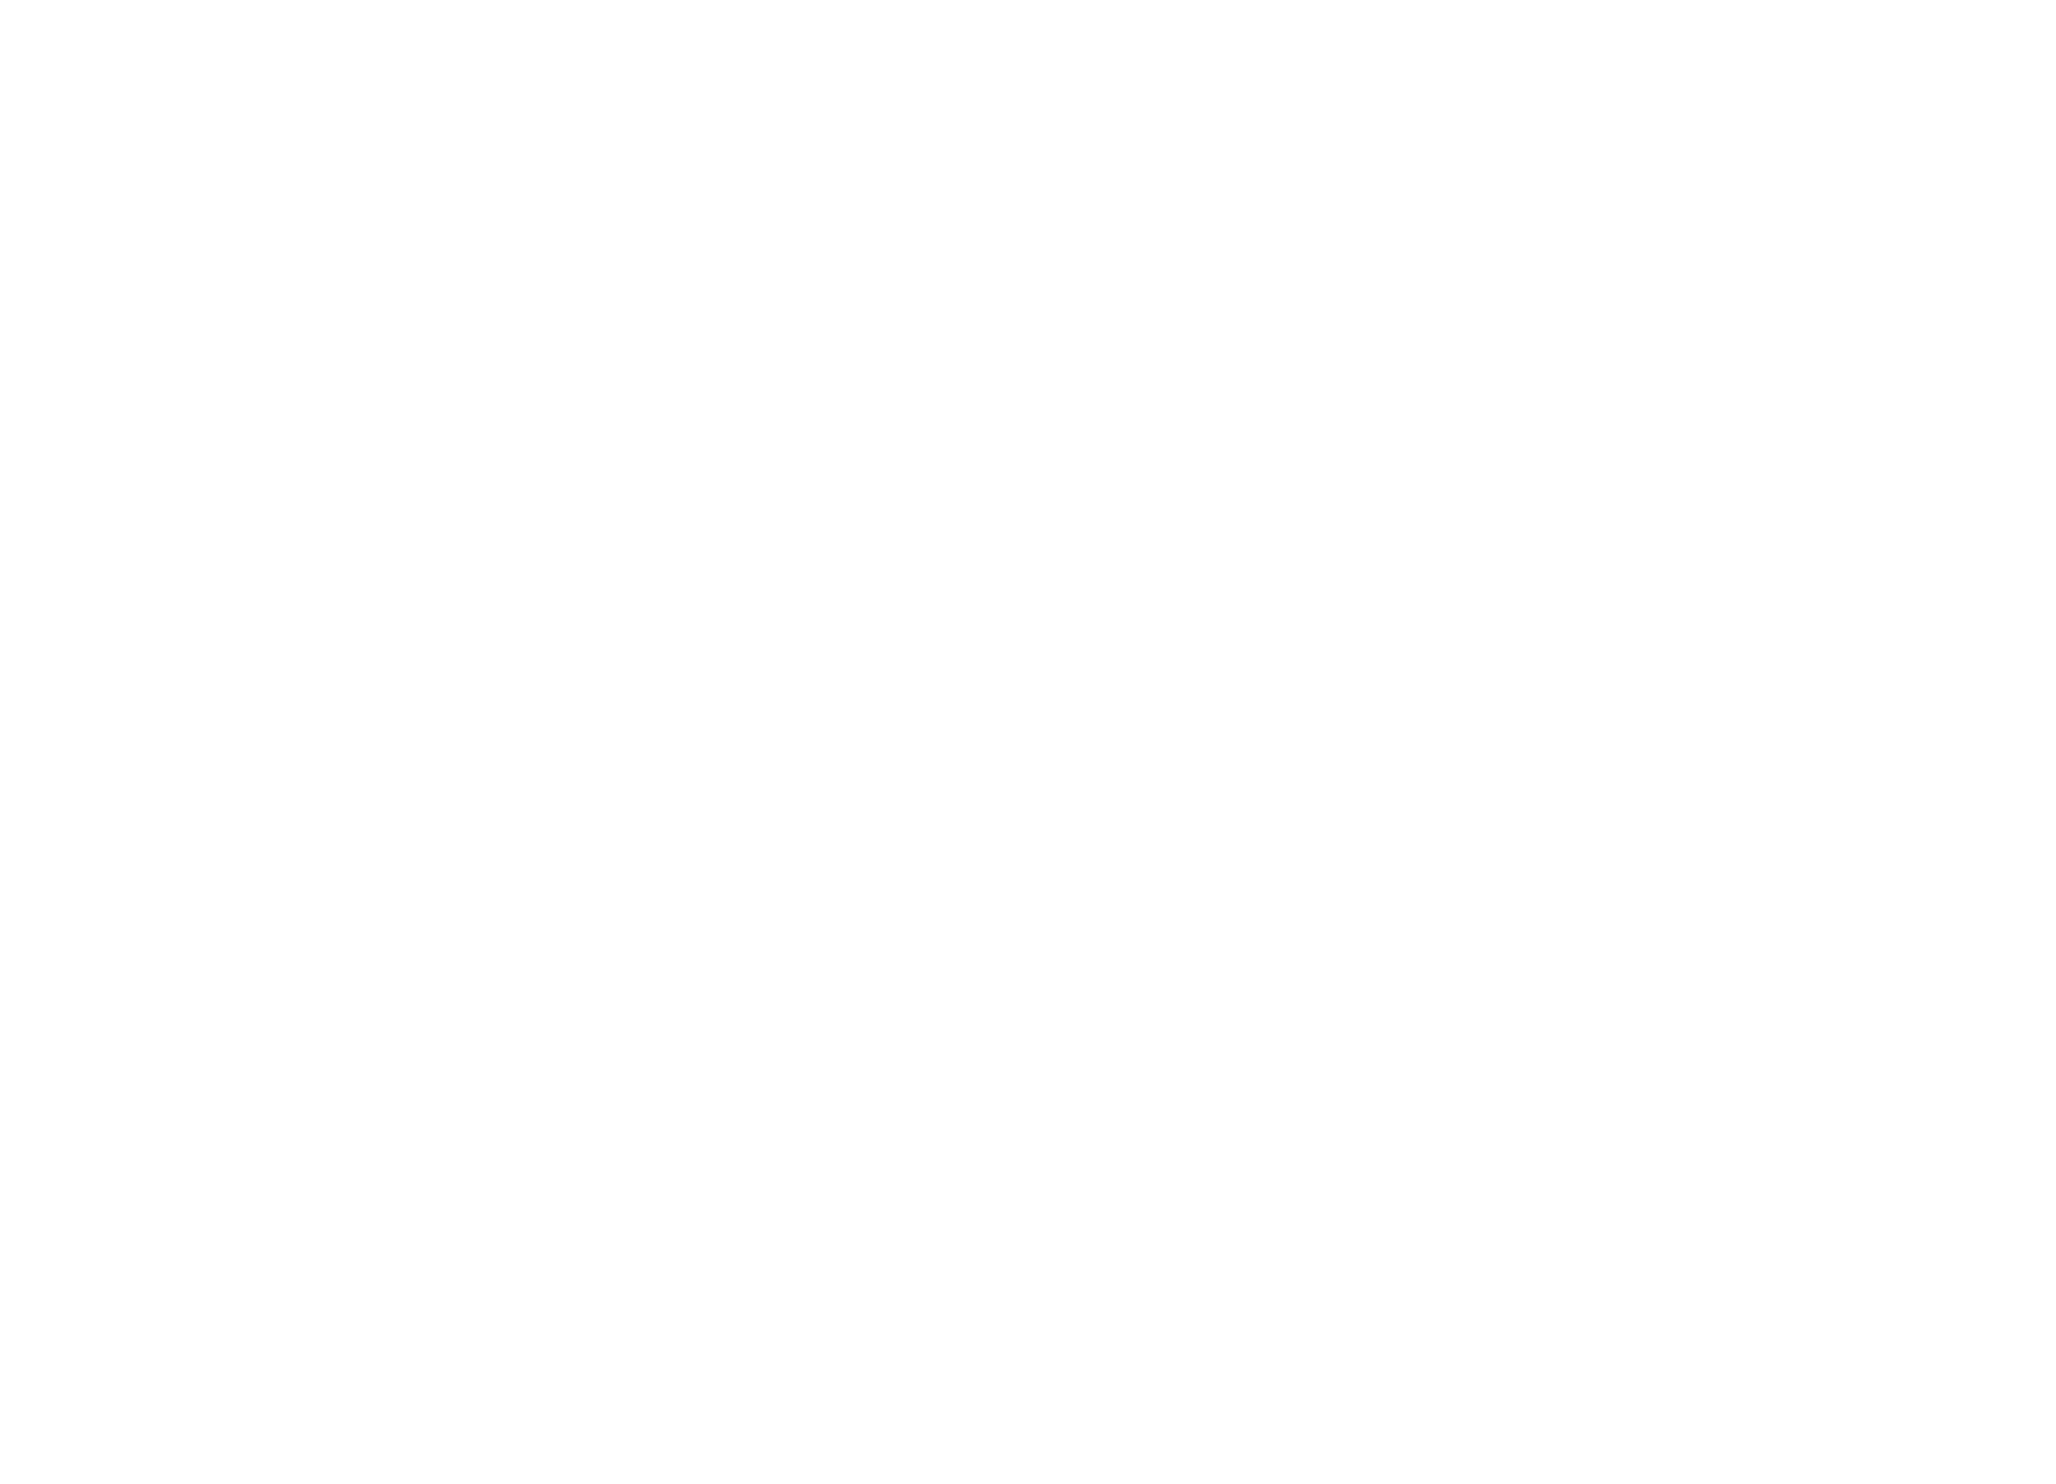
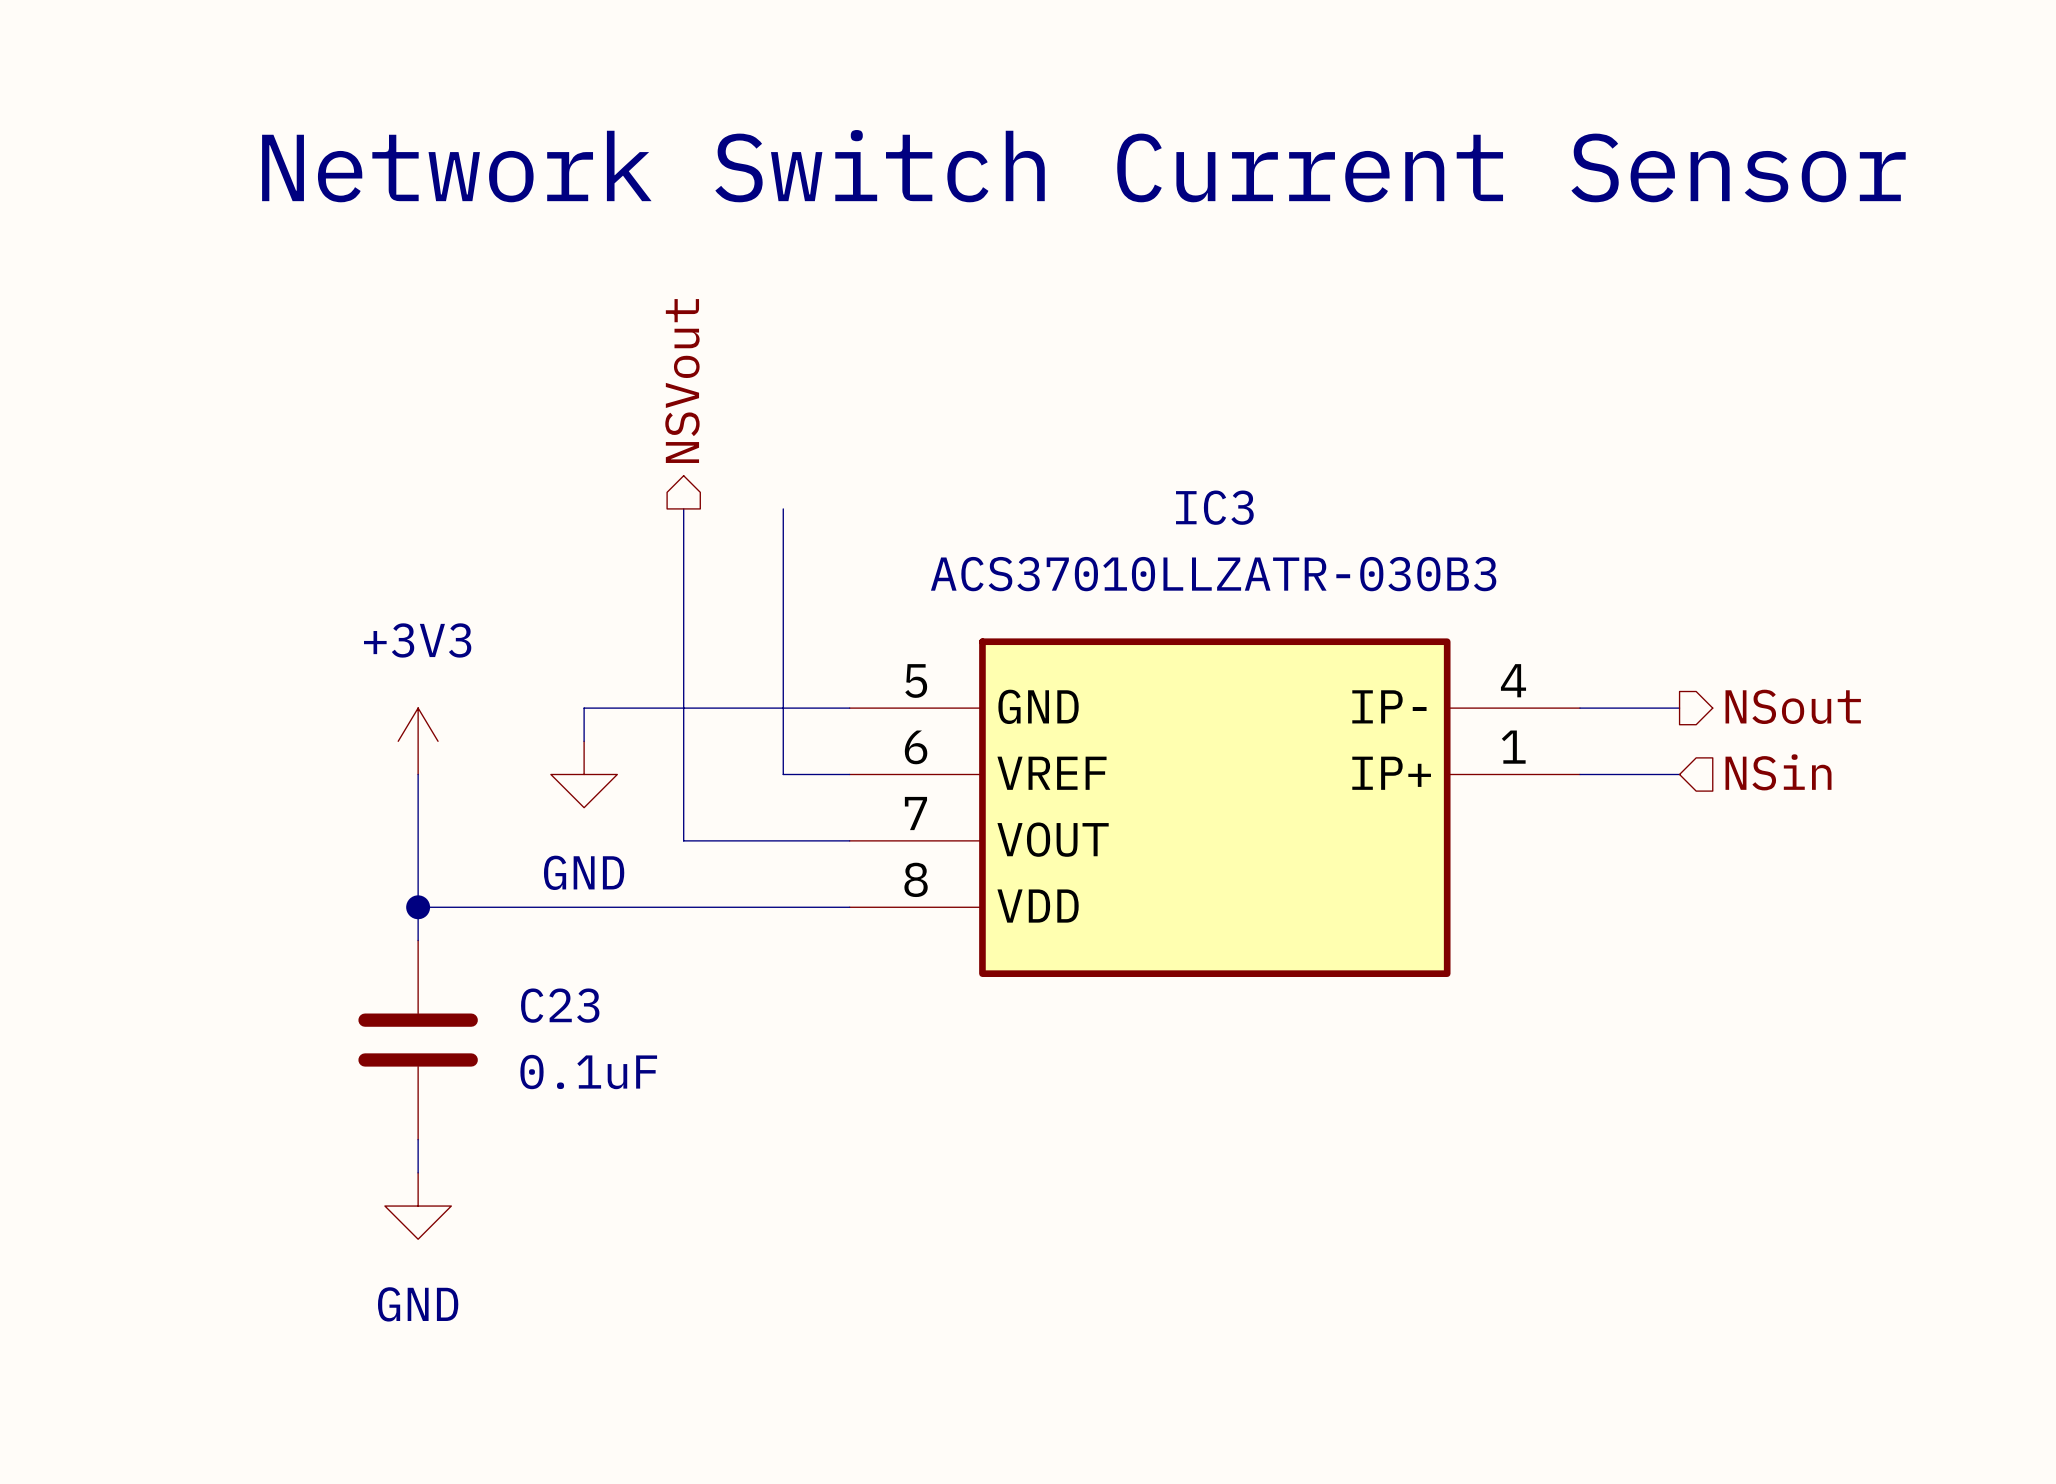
text: none -> Network Switch Current Sensor (1083, 166)
hierarchical label: none -> NSVout (682, 381)
wire: none -> (683, 508) (683, 840) (849, 840)
wire: none -> (783, 508) (783, 774) (849, 774)
hierarchical label: none -> NSout (1793, 706)
wire: none -> (849, 708) (584, 708) (584, 741)
wire: none -> (1579, 708) (1679, 708)
power symbol: none -> +3V3 (418, 741)
hierarchical label: none -> NSin (1778, 772)
wire: none -> (418, 774) (418, 940)
power symbol: none -> GND (584, 774)
wire: none -> (1579, 774) (1679, 774)
IC3: none -> ACS37010LLZATR-030B3 (1214, 807)
wire: none -> (418, 907) (849, 907)
junction: none -> (418, 907)
C23: none -> 0.1uF (418, 1040)
wire: none -> (418, 1139) (418, 1172)
power symbol: none -> GND (418, 1206)

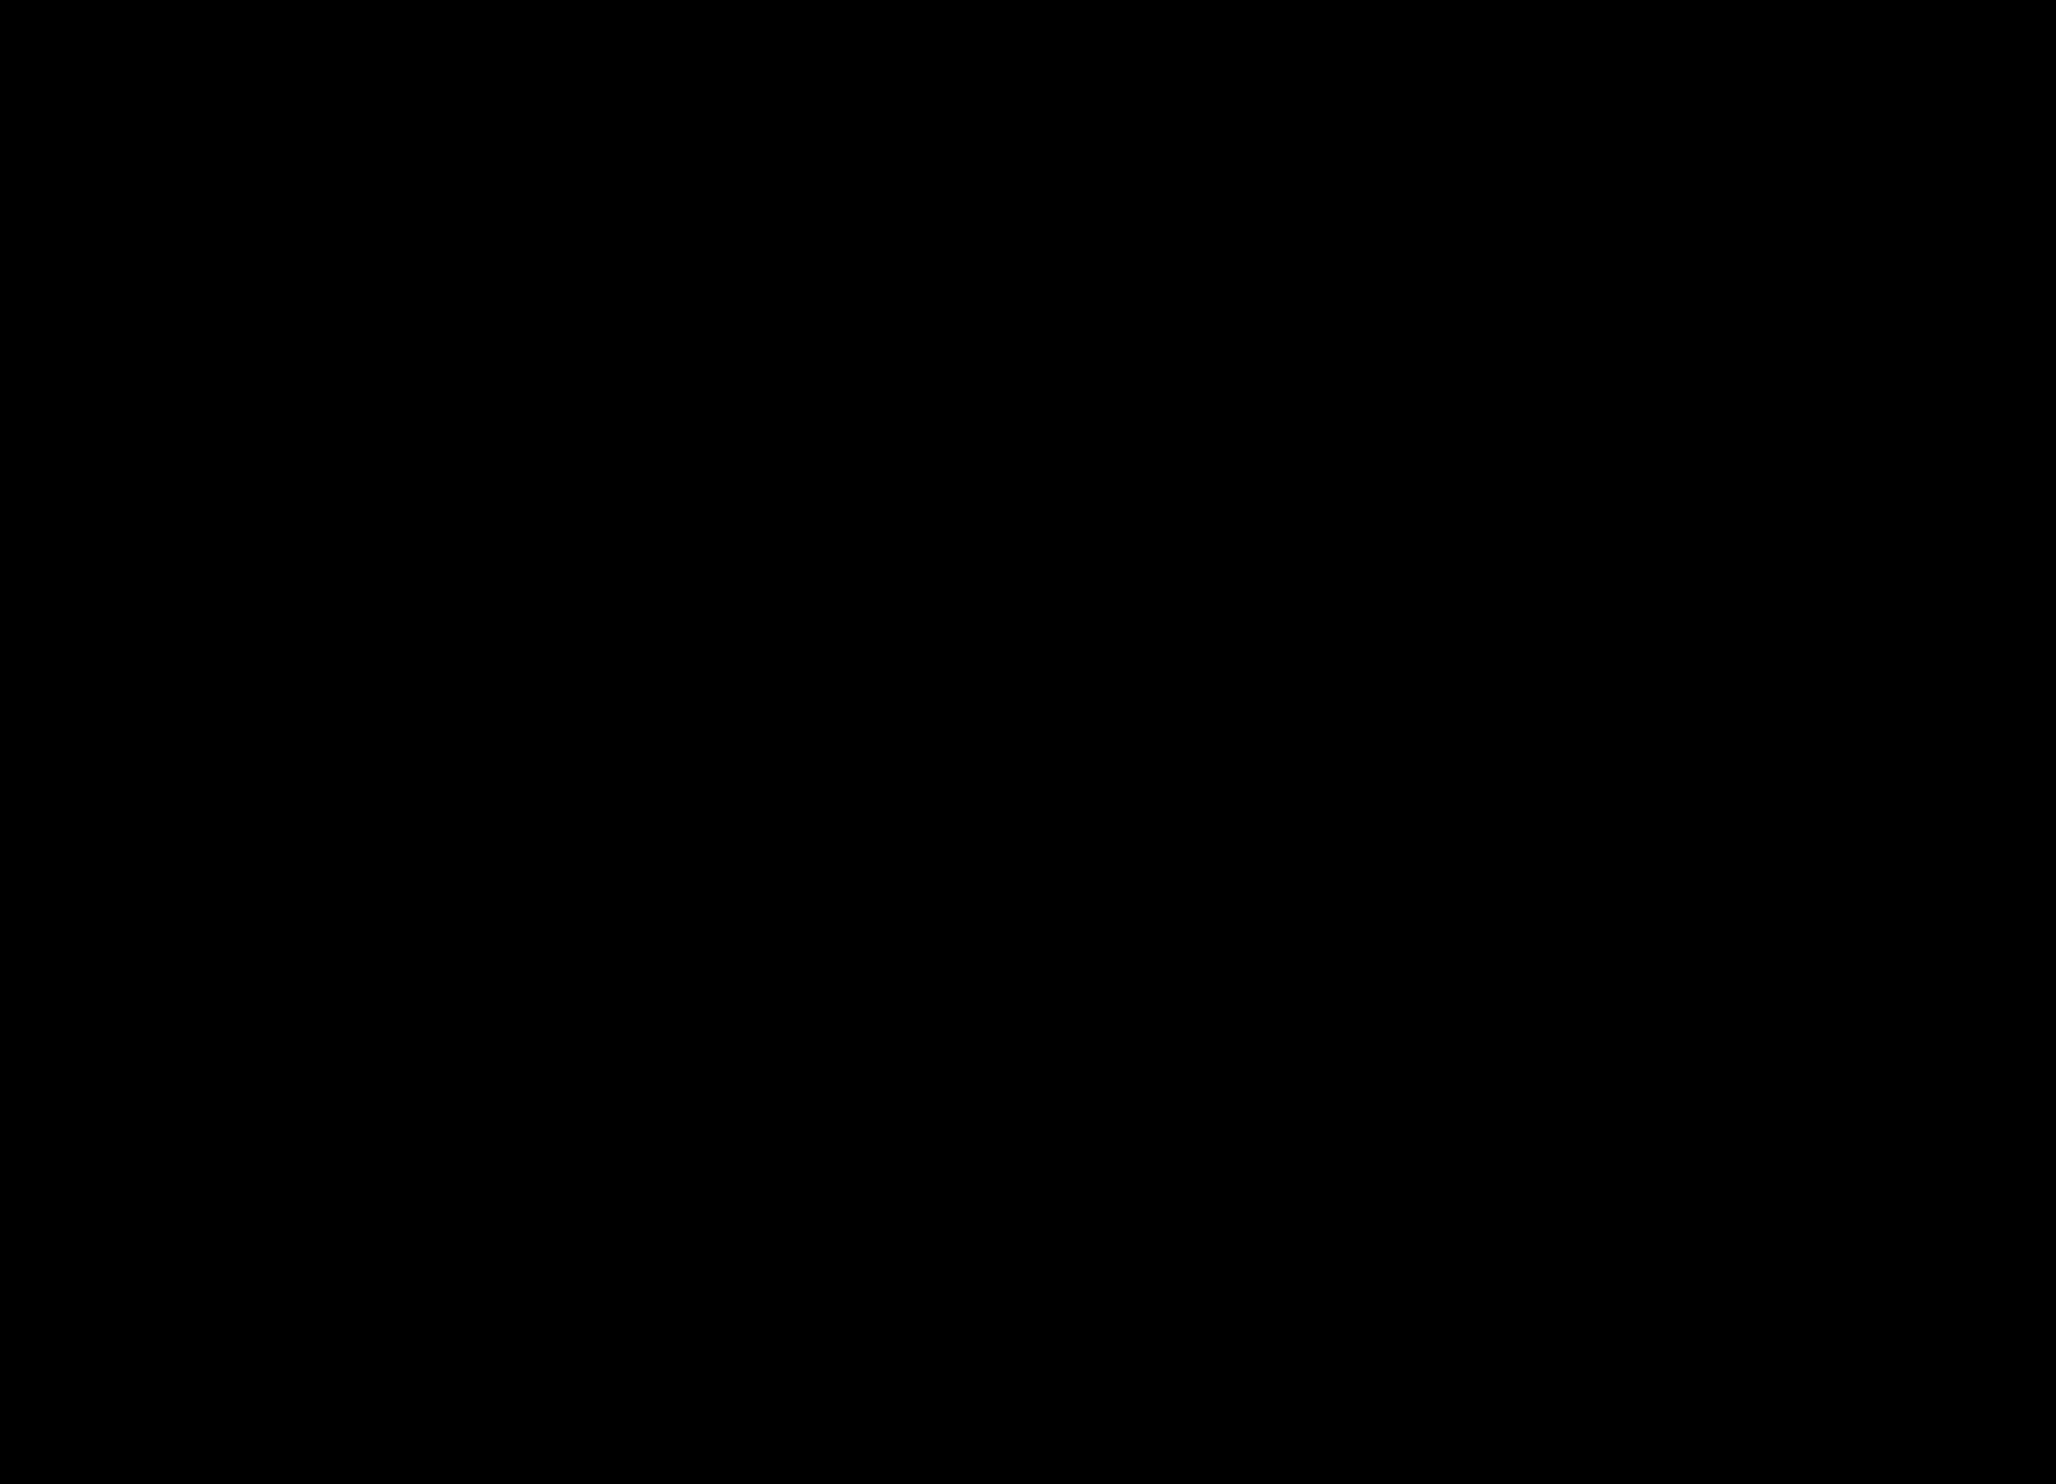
text: Network Switch Current Sensor (1083, 166) -> none
hierarchical label: NSVout (682, 381) -> none
wire: (683, 508) (683, 840) (849, 840) -> none
wire: (783, 508) (783, 774) (849, 774) -> none
hierarchical label: NSout (1793, 706) -> none
wire: (849, 708) (584, 708) (584, 741) -> none
wire: (1579, 708) (1679, 708) -> none
power symbol: +3V3 (418, 741) -> none
hierarchical label: NSin (1778, 772) -> none
wire: (418, 774) (418, 940) -> none
power symbol: GND (584, 774) -> none
wire: (1579, 774) (1679, 774) -> none
IC3: ACS37010LLZATR-030B3 (1214, 807) -> none
wire: (418, 907) (849, 907) -> none
junction: (418, 907) -> none
C23: 0.1uF (418, 1040) -> none
wire: (418, 1139) (418, 1172) -> none
power symbol: GND (418, 1206) -> none

